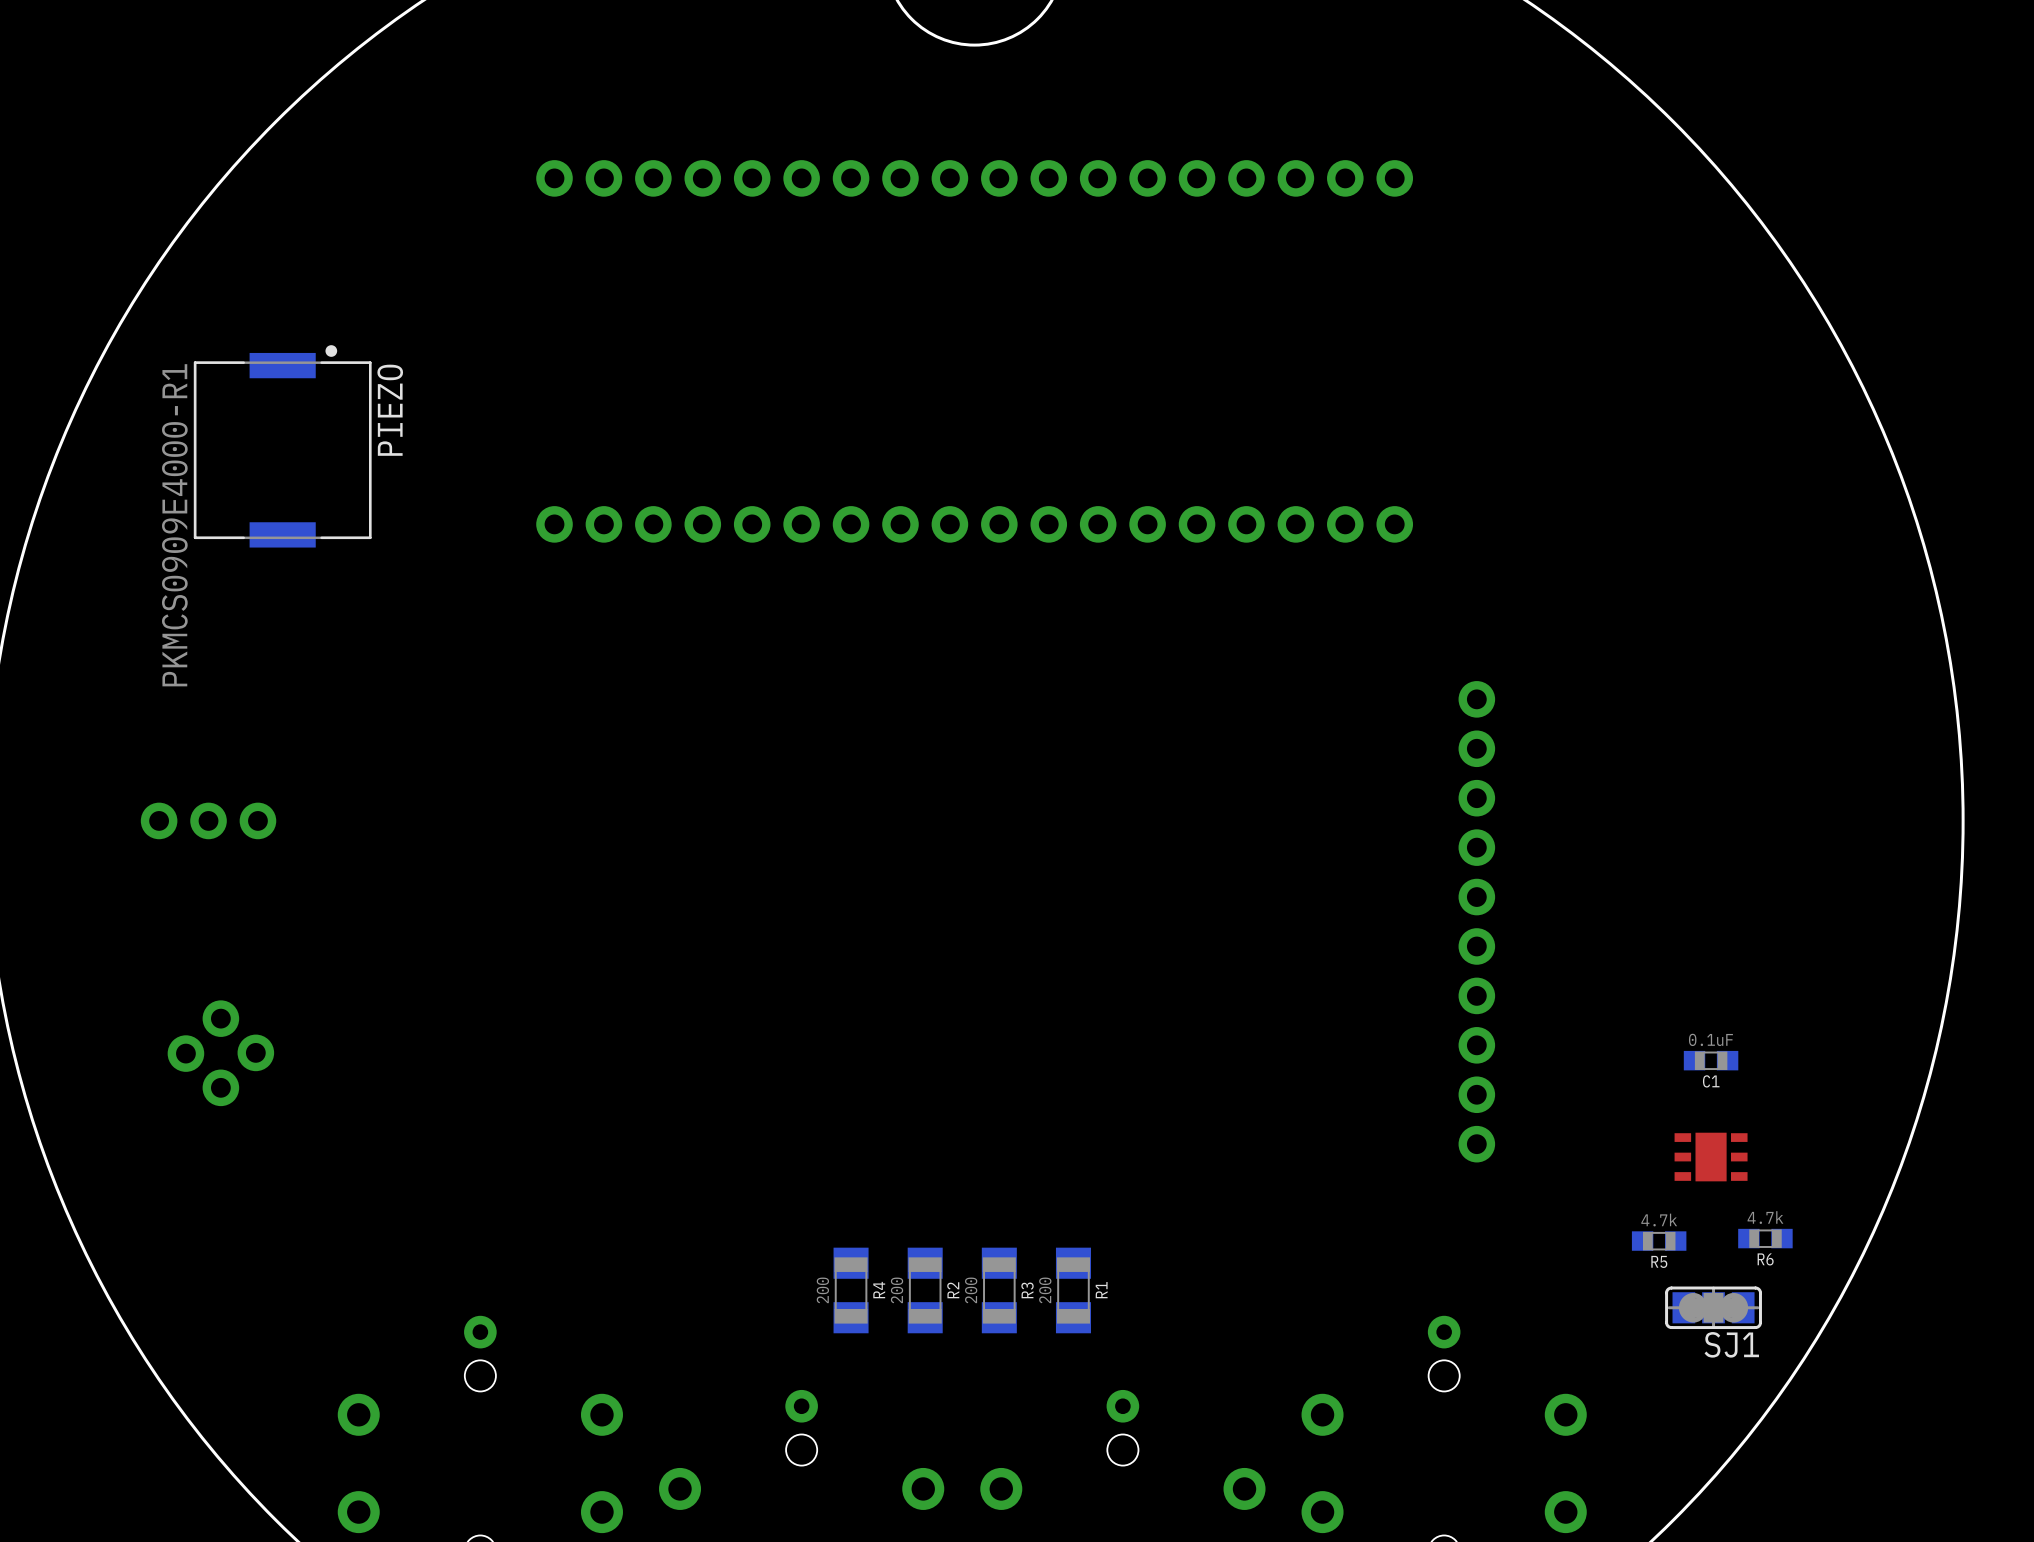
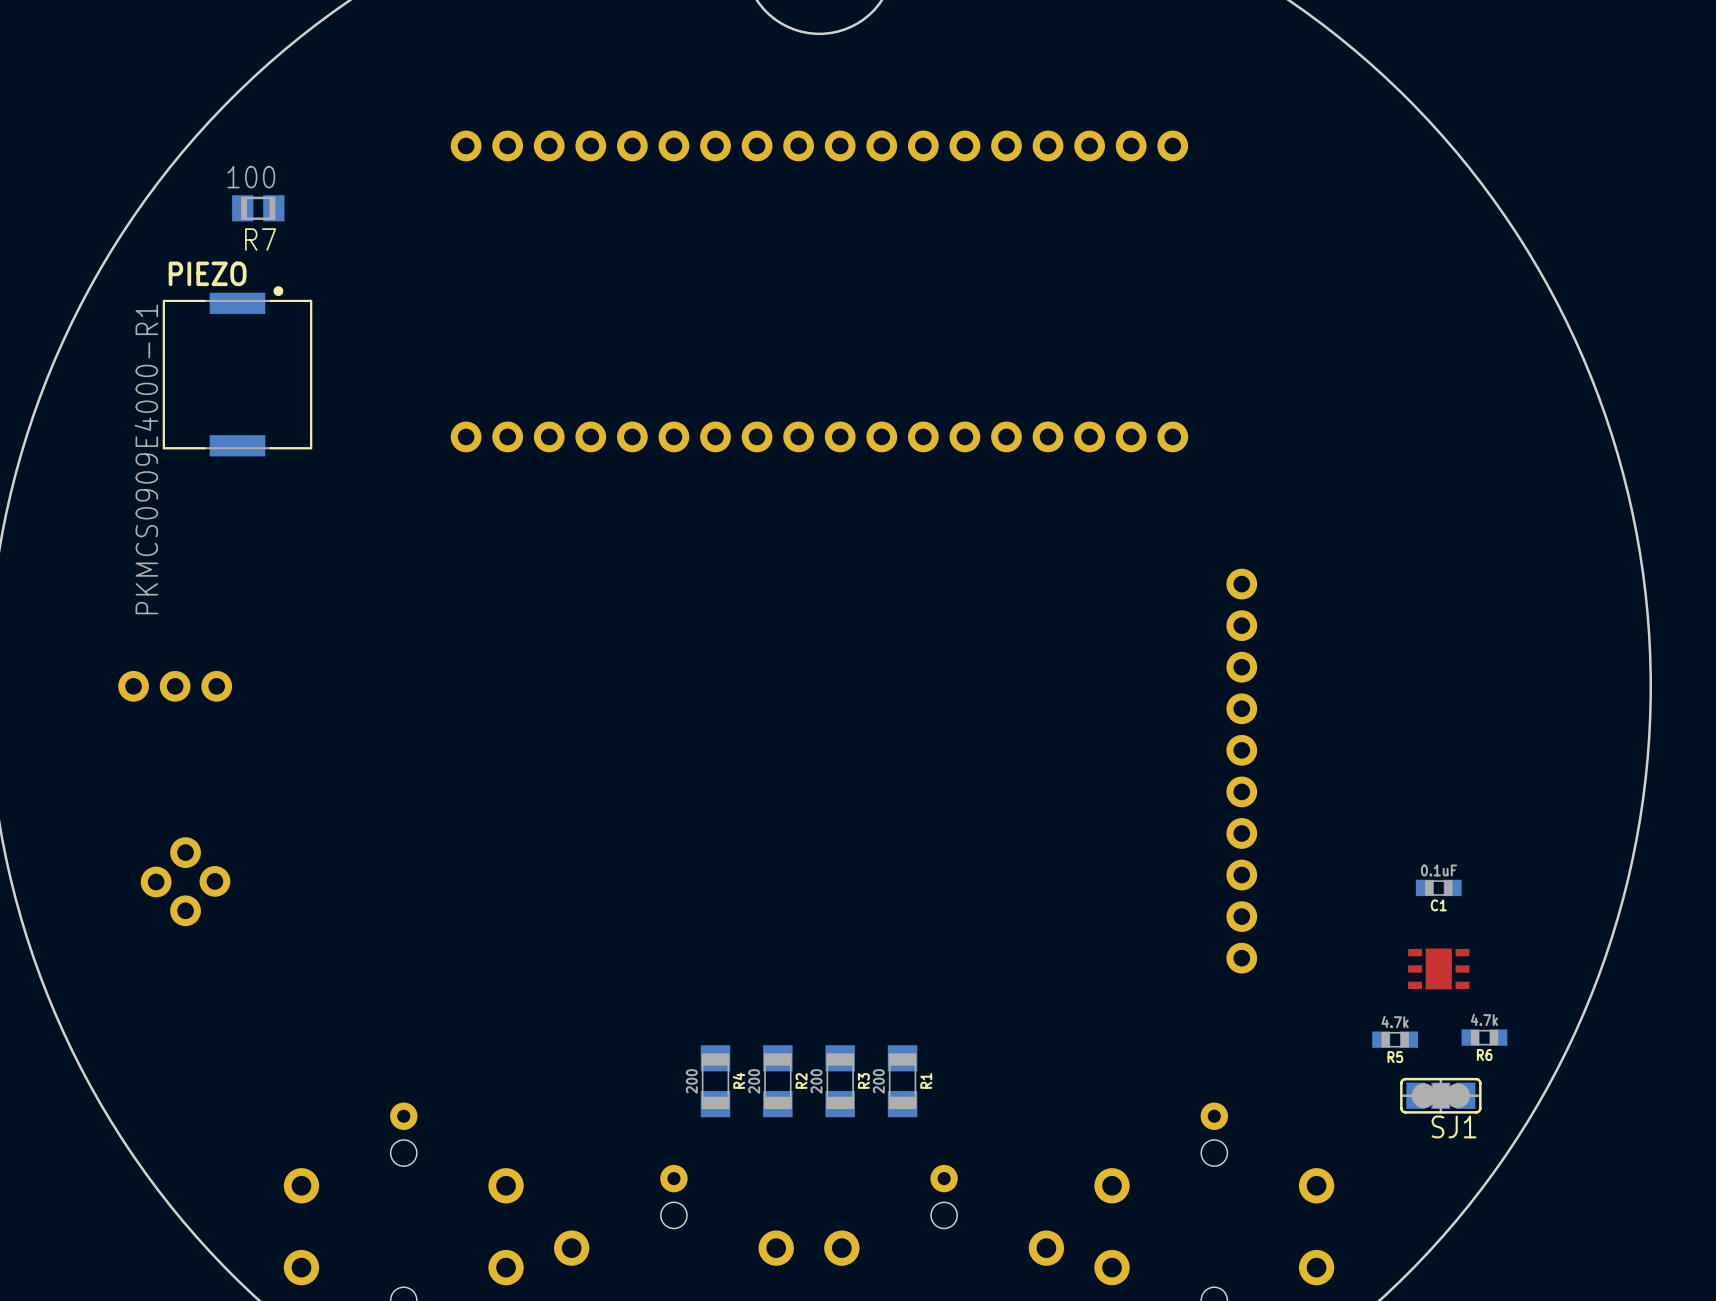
R7: none -> 100 (258, 208)
PIEZO name rotation: 0° (390, 410) -> 90° clockwise (207, 273)
PIEZO name position: PIEZO (390, 410) -> PIEZO (207, 273)

